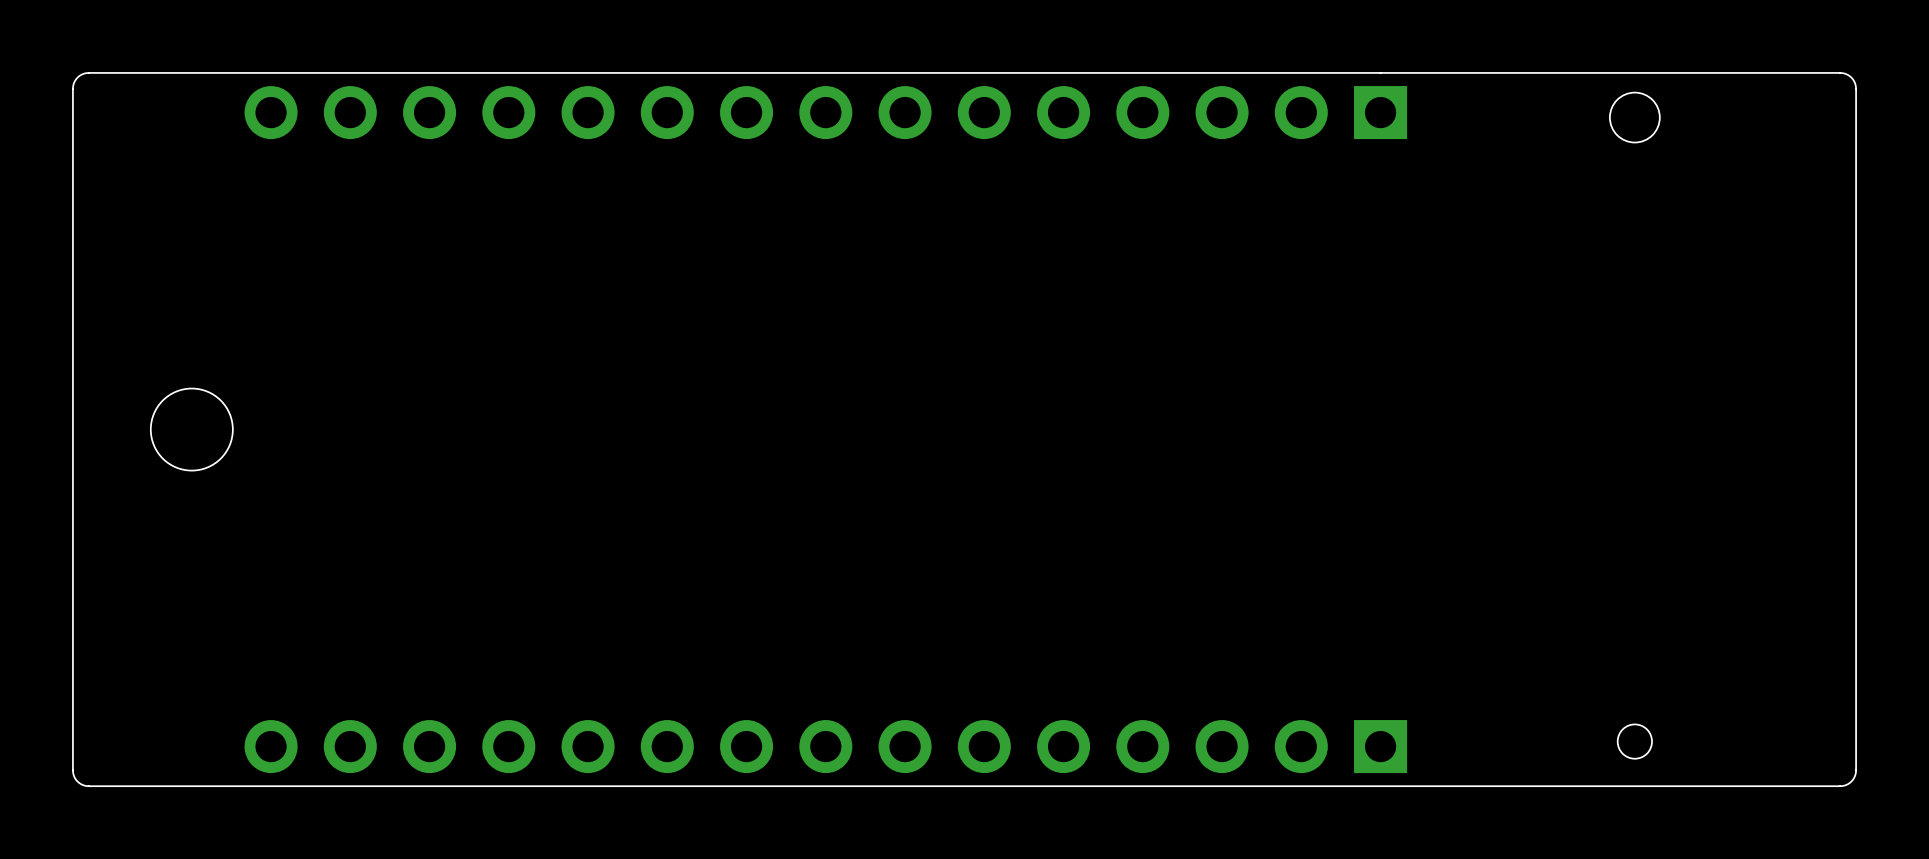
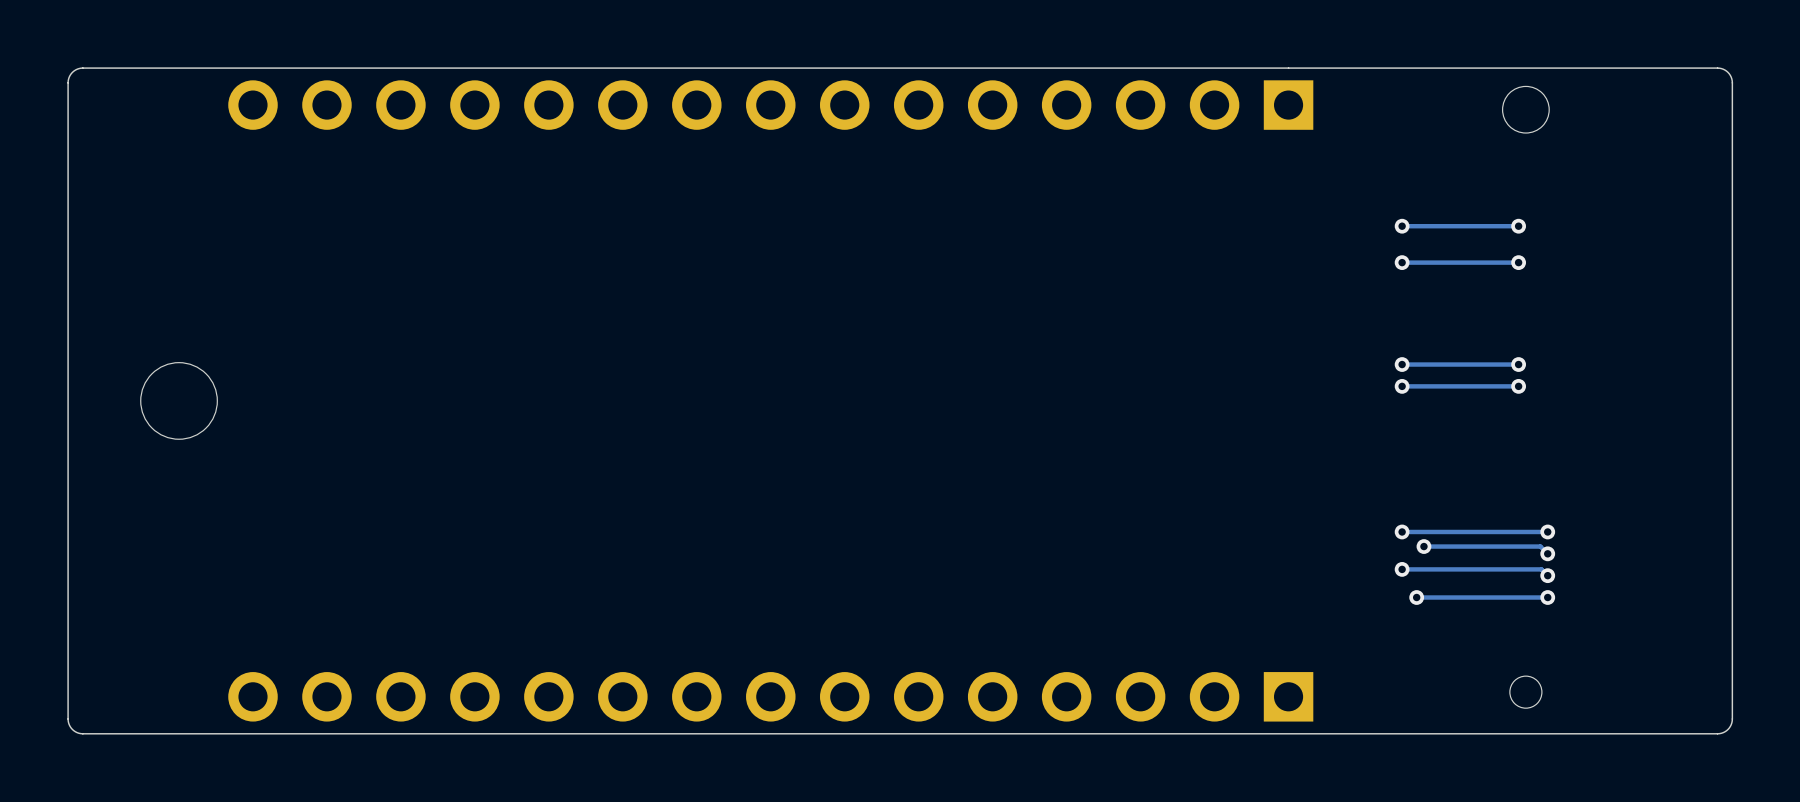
via: none -> (1402, 226)
track: none -> (1518, 226) (1402, 226)
via: none -> (1518, 226)
via: none -> (1402, 262)
track: none -> (1518, 262) (1402, 262)
via: none -> (1518, 262)
via: none -> (1402, 364)
track: none -> (1518, 364) (1402, 364)
via: none -> (1518, 364)
via: none -> (1402, 386)
track: none -> (1518, 386) (1402, 386)
via: none -> (1518, 386)
via: none -> (1402, 531)
track: none -> (1547, 531) (1402, 531)
via: none -> (1547, 531)
track: none -> (1423, 546) (1540, 546) (1547, 553)
via: none -> (1423, 546)
via: none -> (1547, 553)
track: none -> (1402, 569) (1541, 569) (1547, 575)
via: none -> (1402, 569)
via: none -> (1547, 575)
via: none -> (1416, 597)
track: none -> (1547, 597) (1416, 597)
via: none -> (1547, 597)

